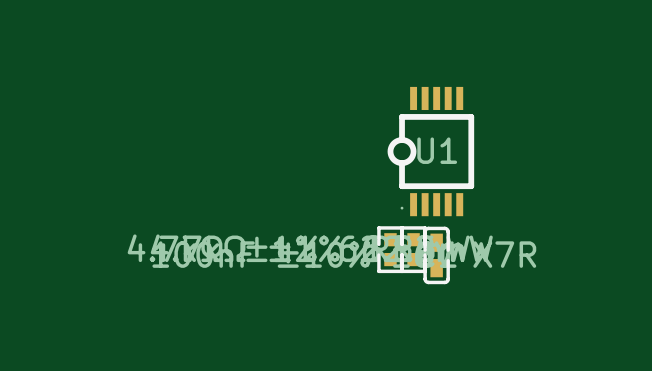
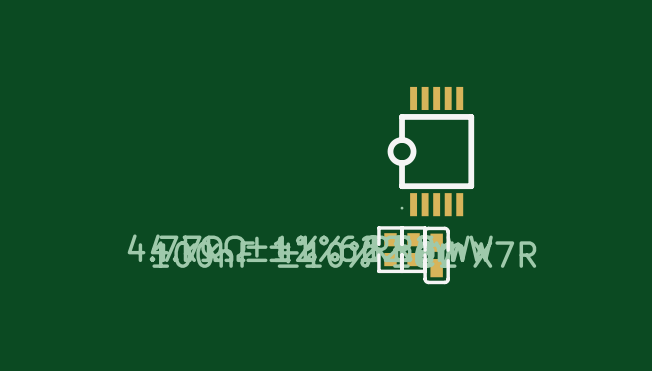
U1 name: U1 (437, 150) -> none

